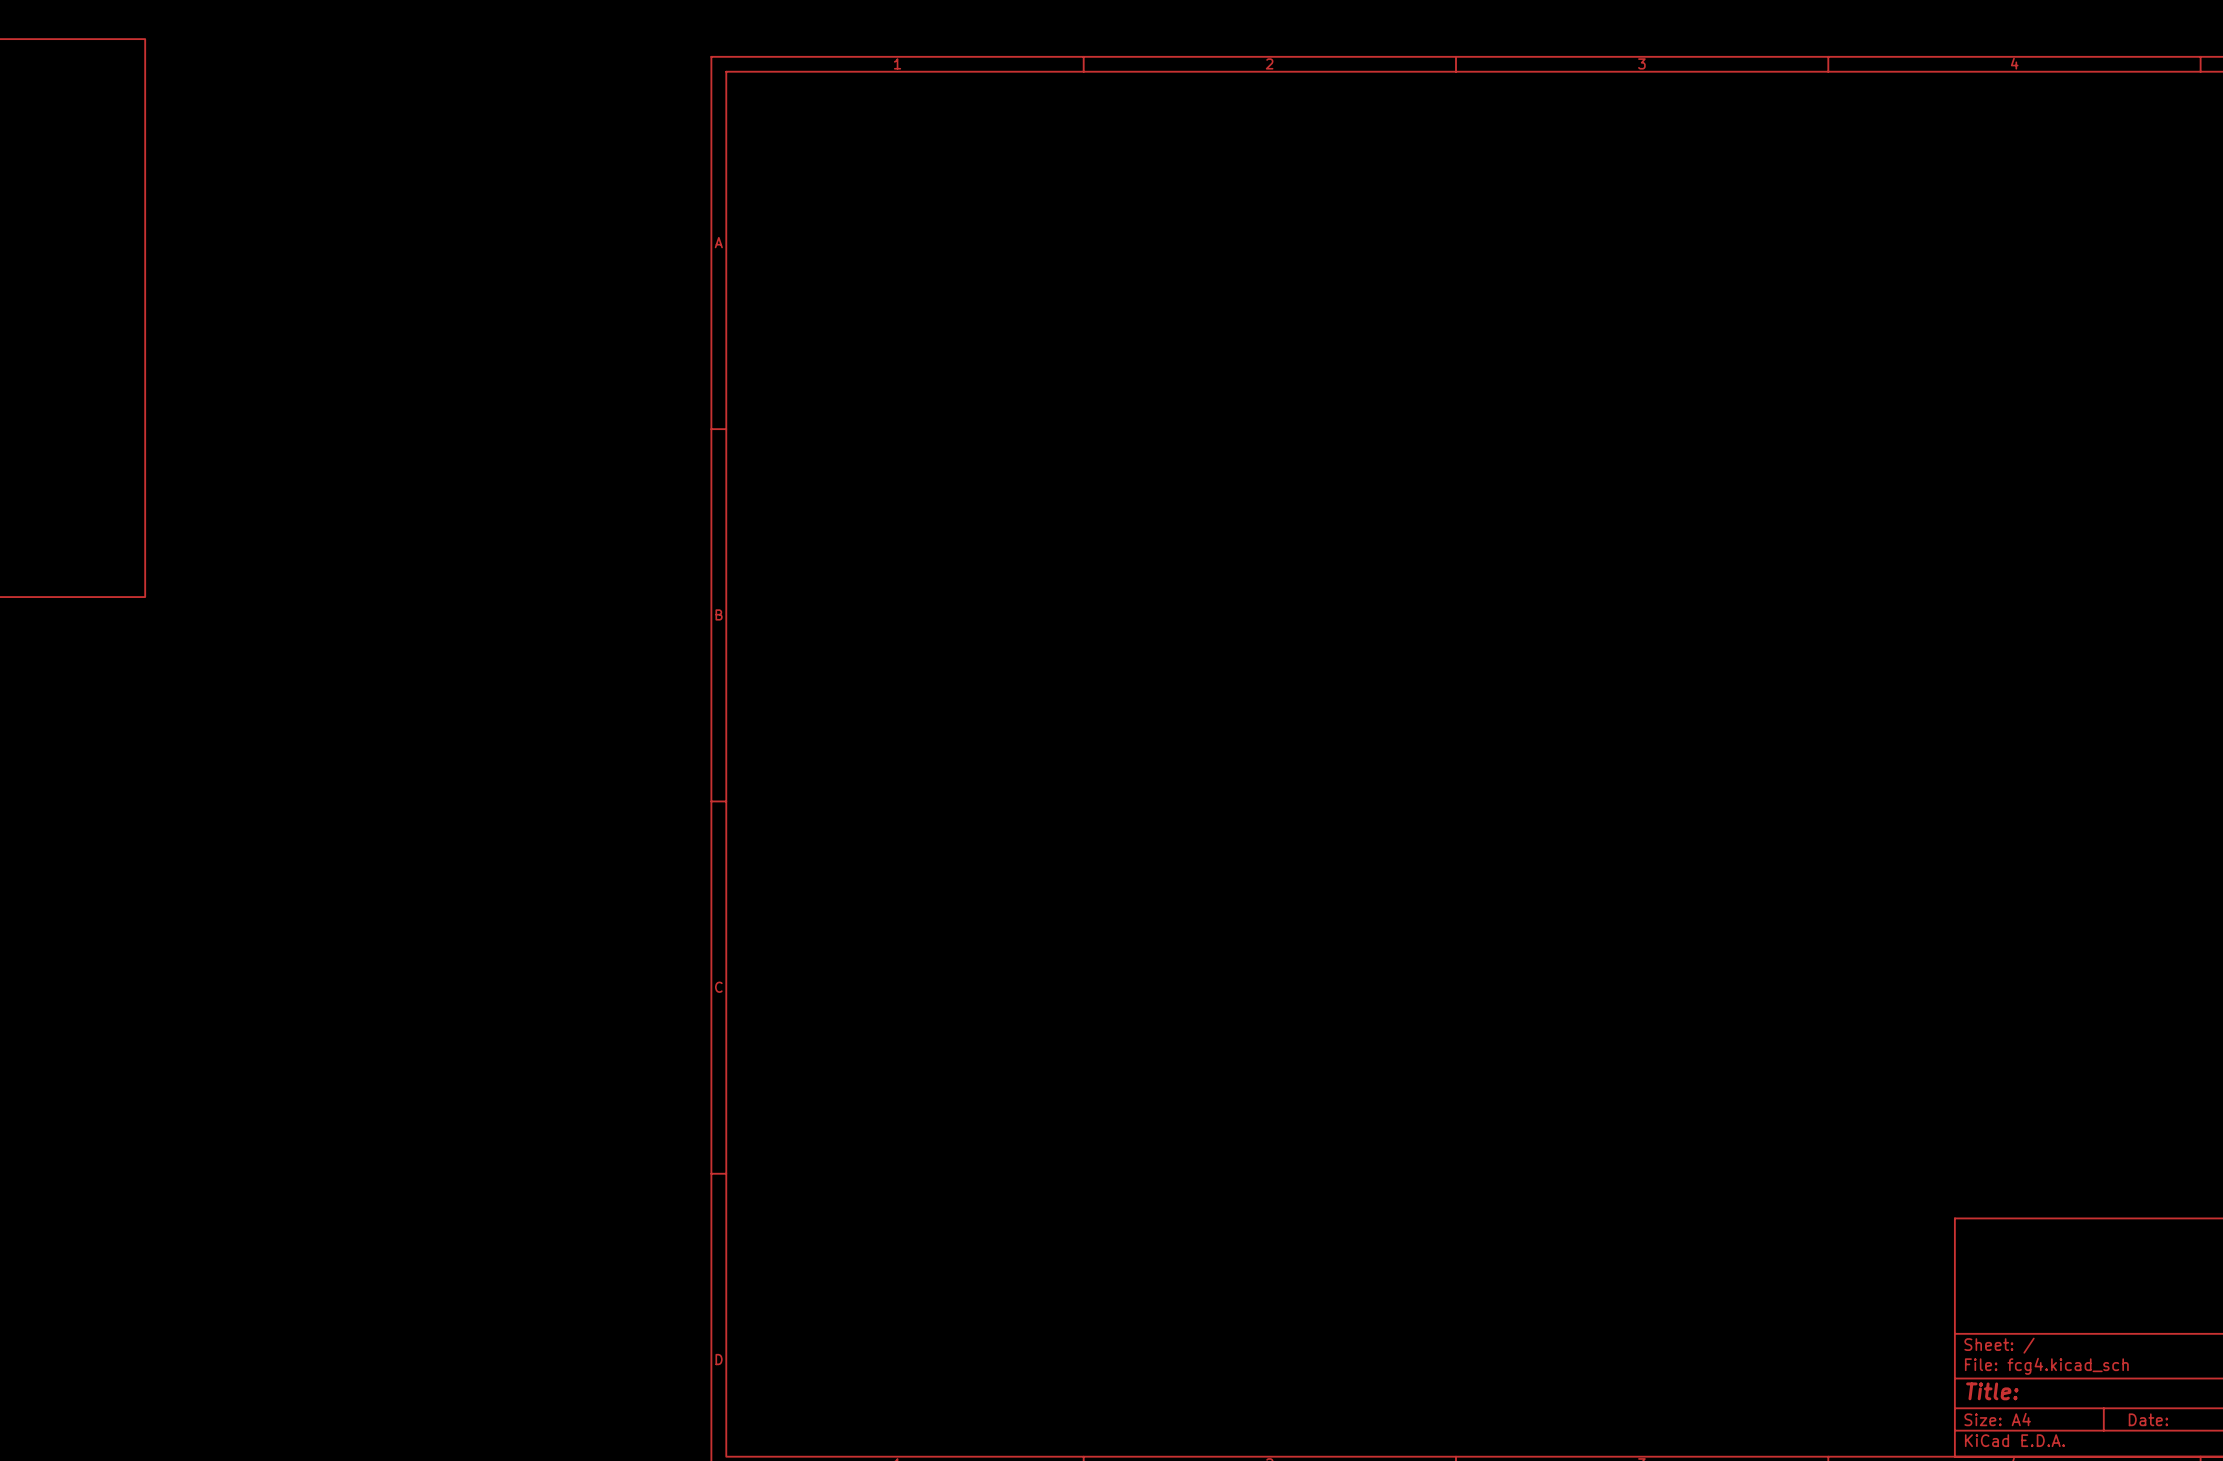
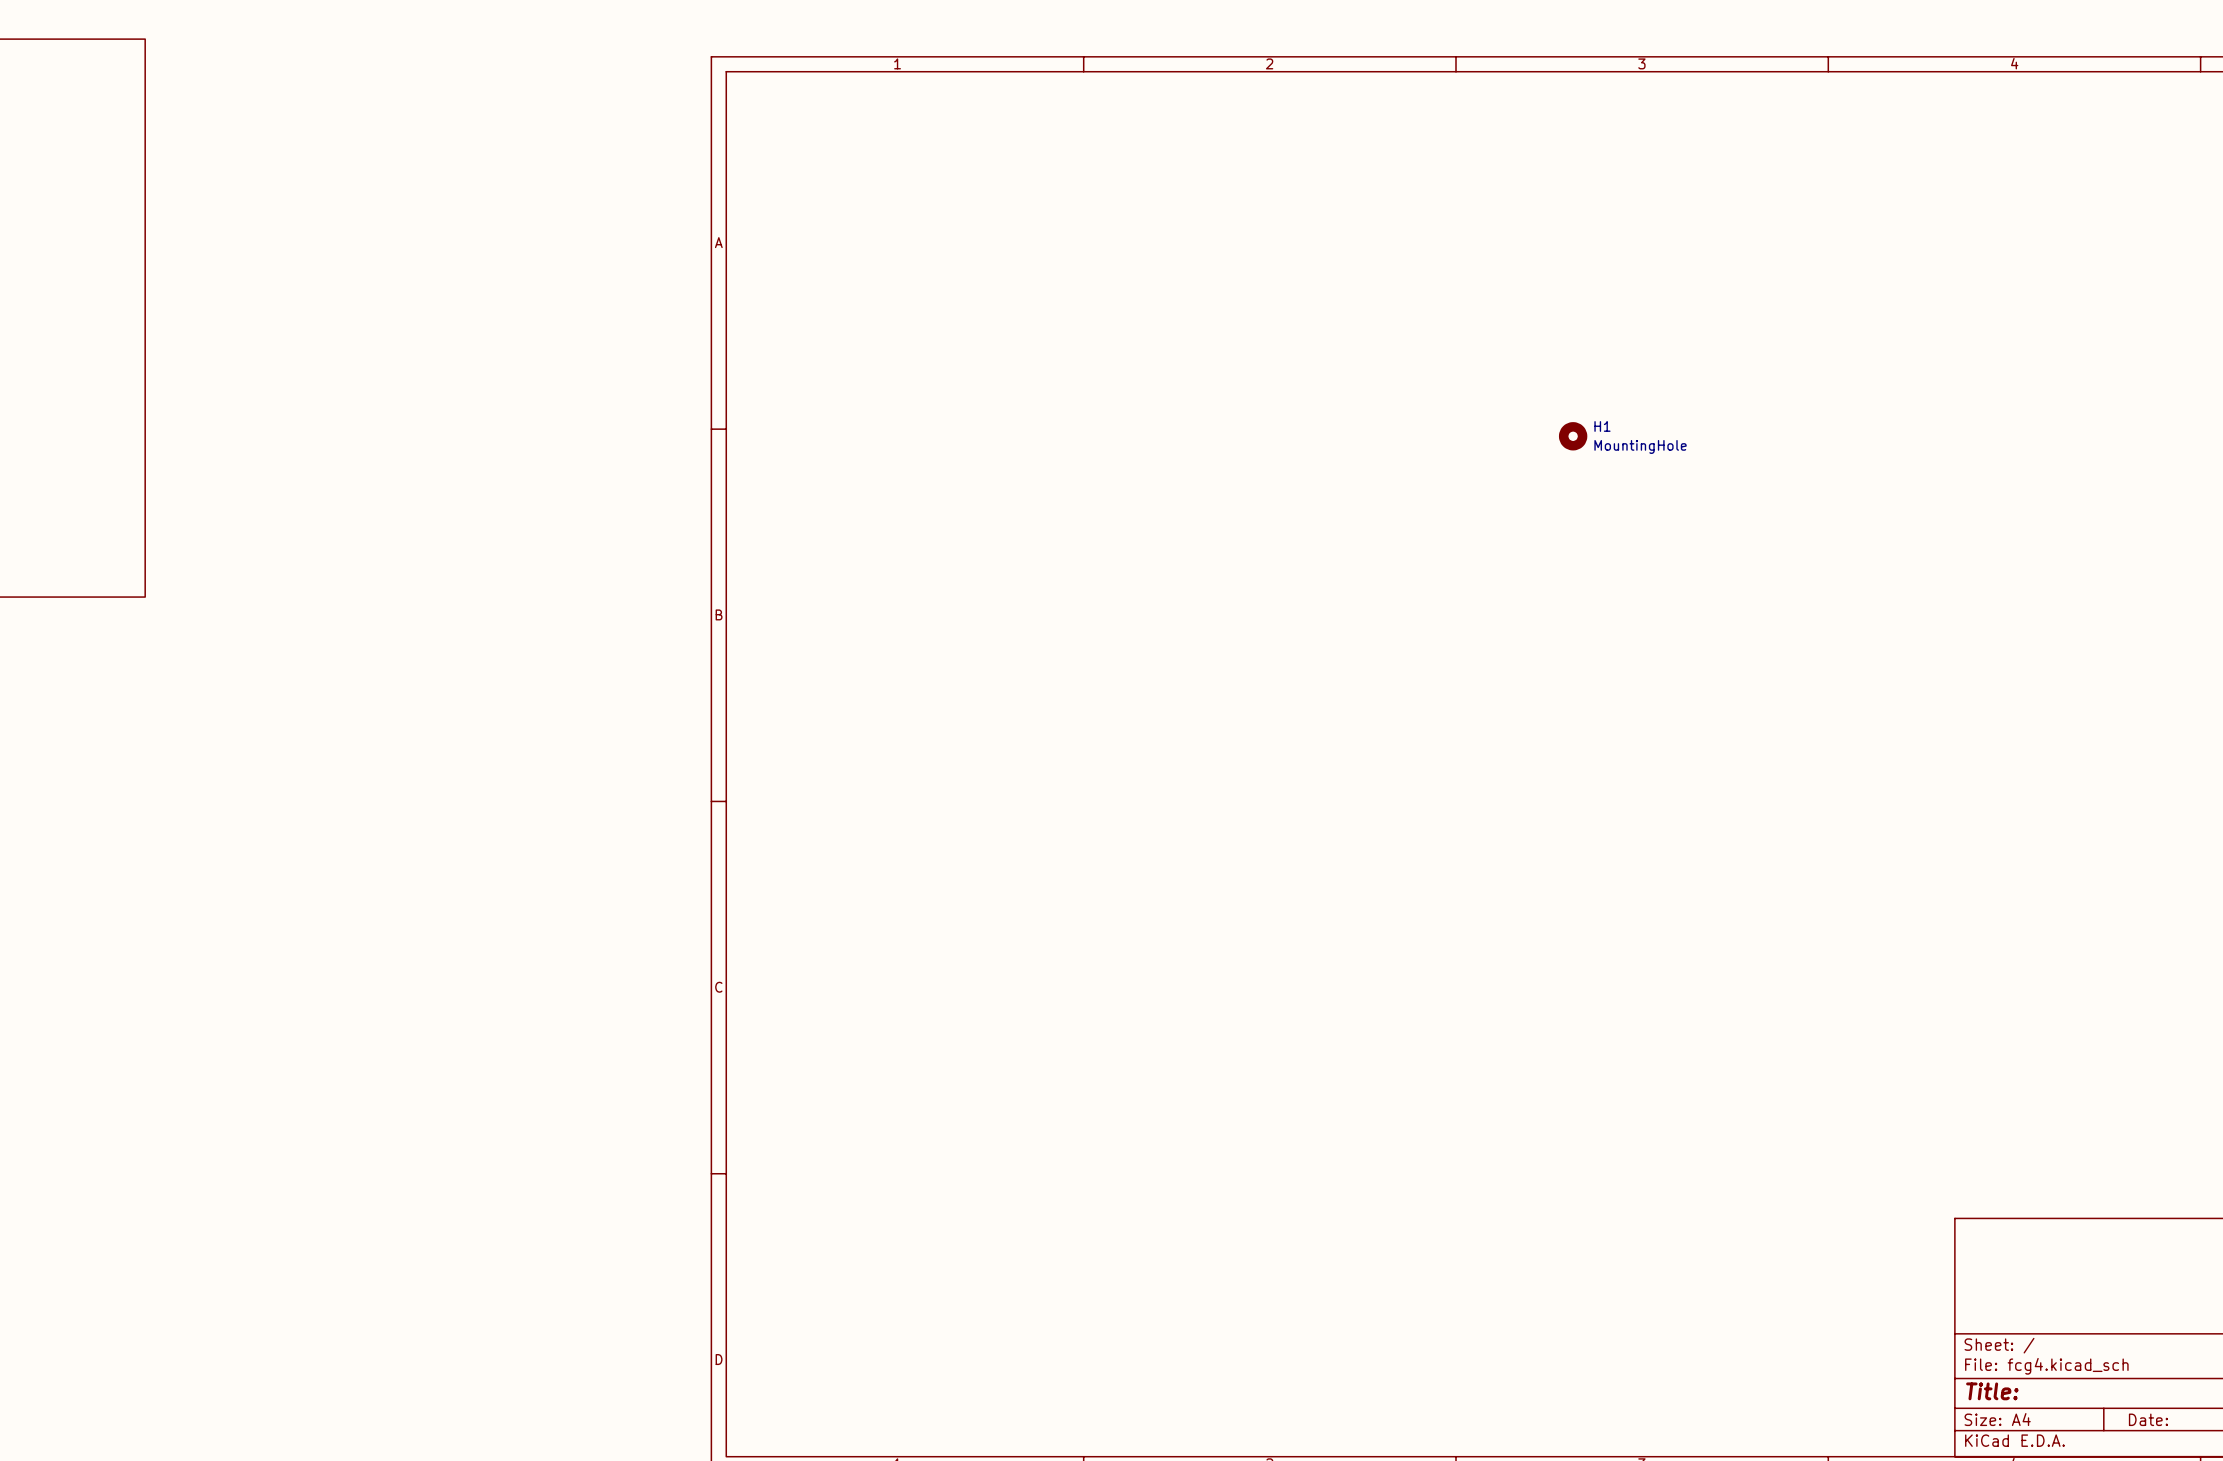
H1: none -> MountingHole (1573, 436)

